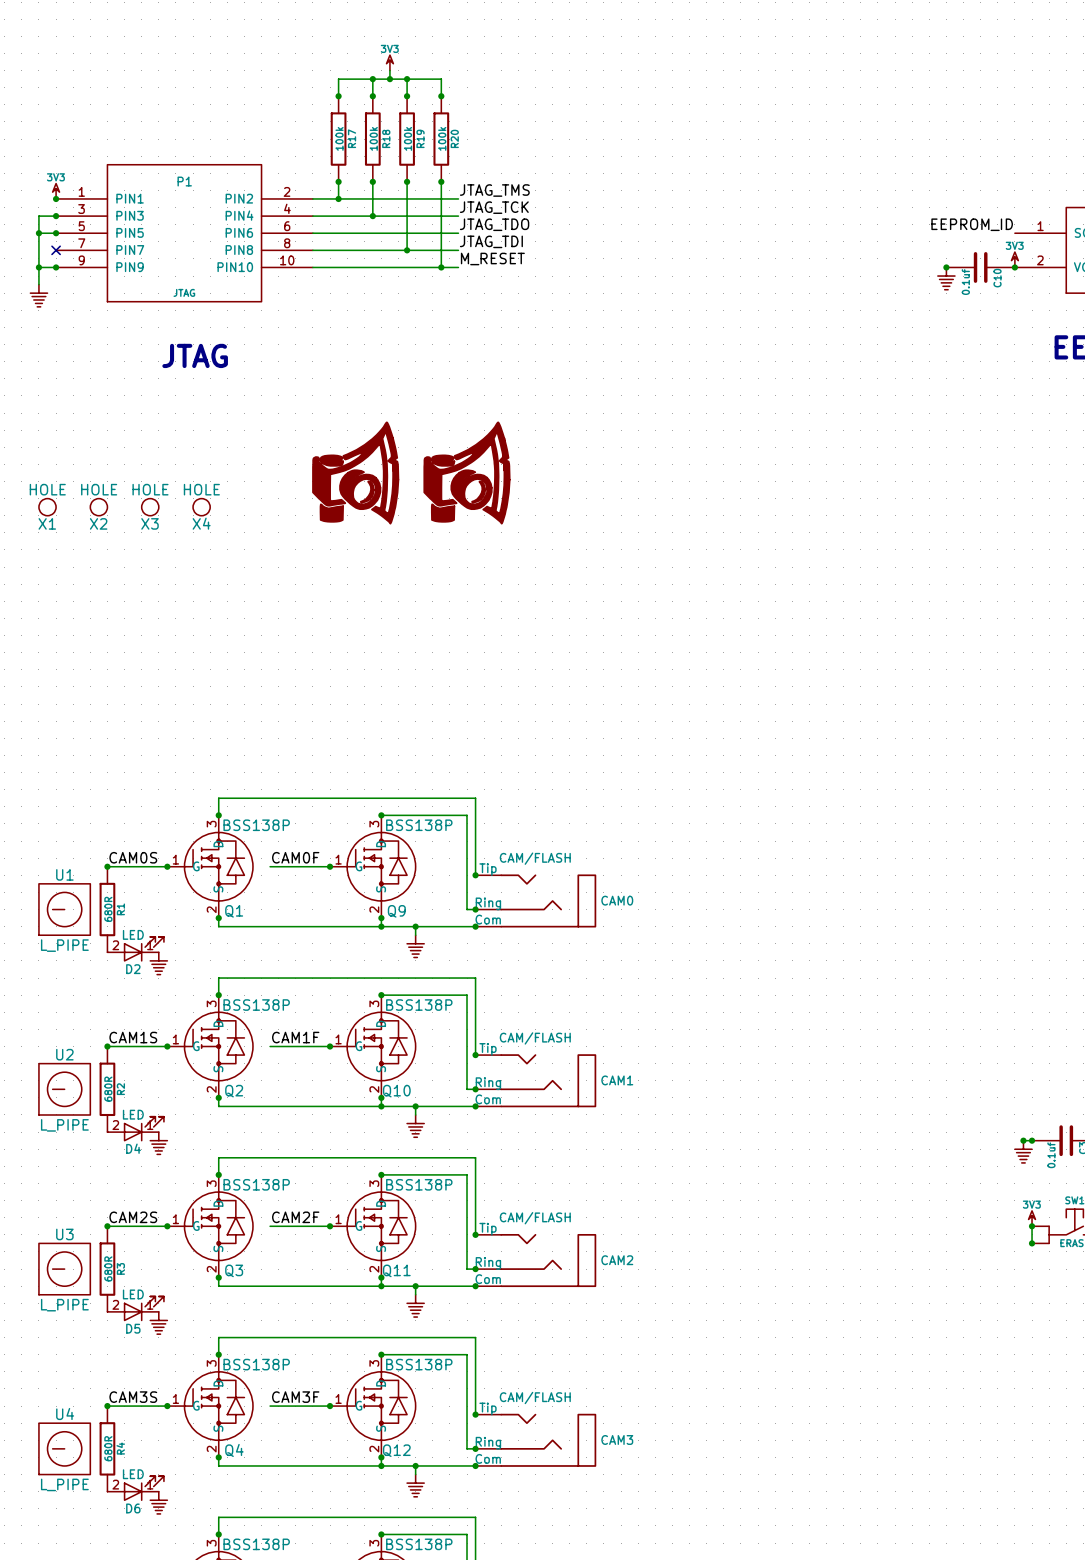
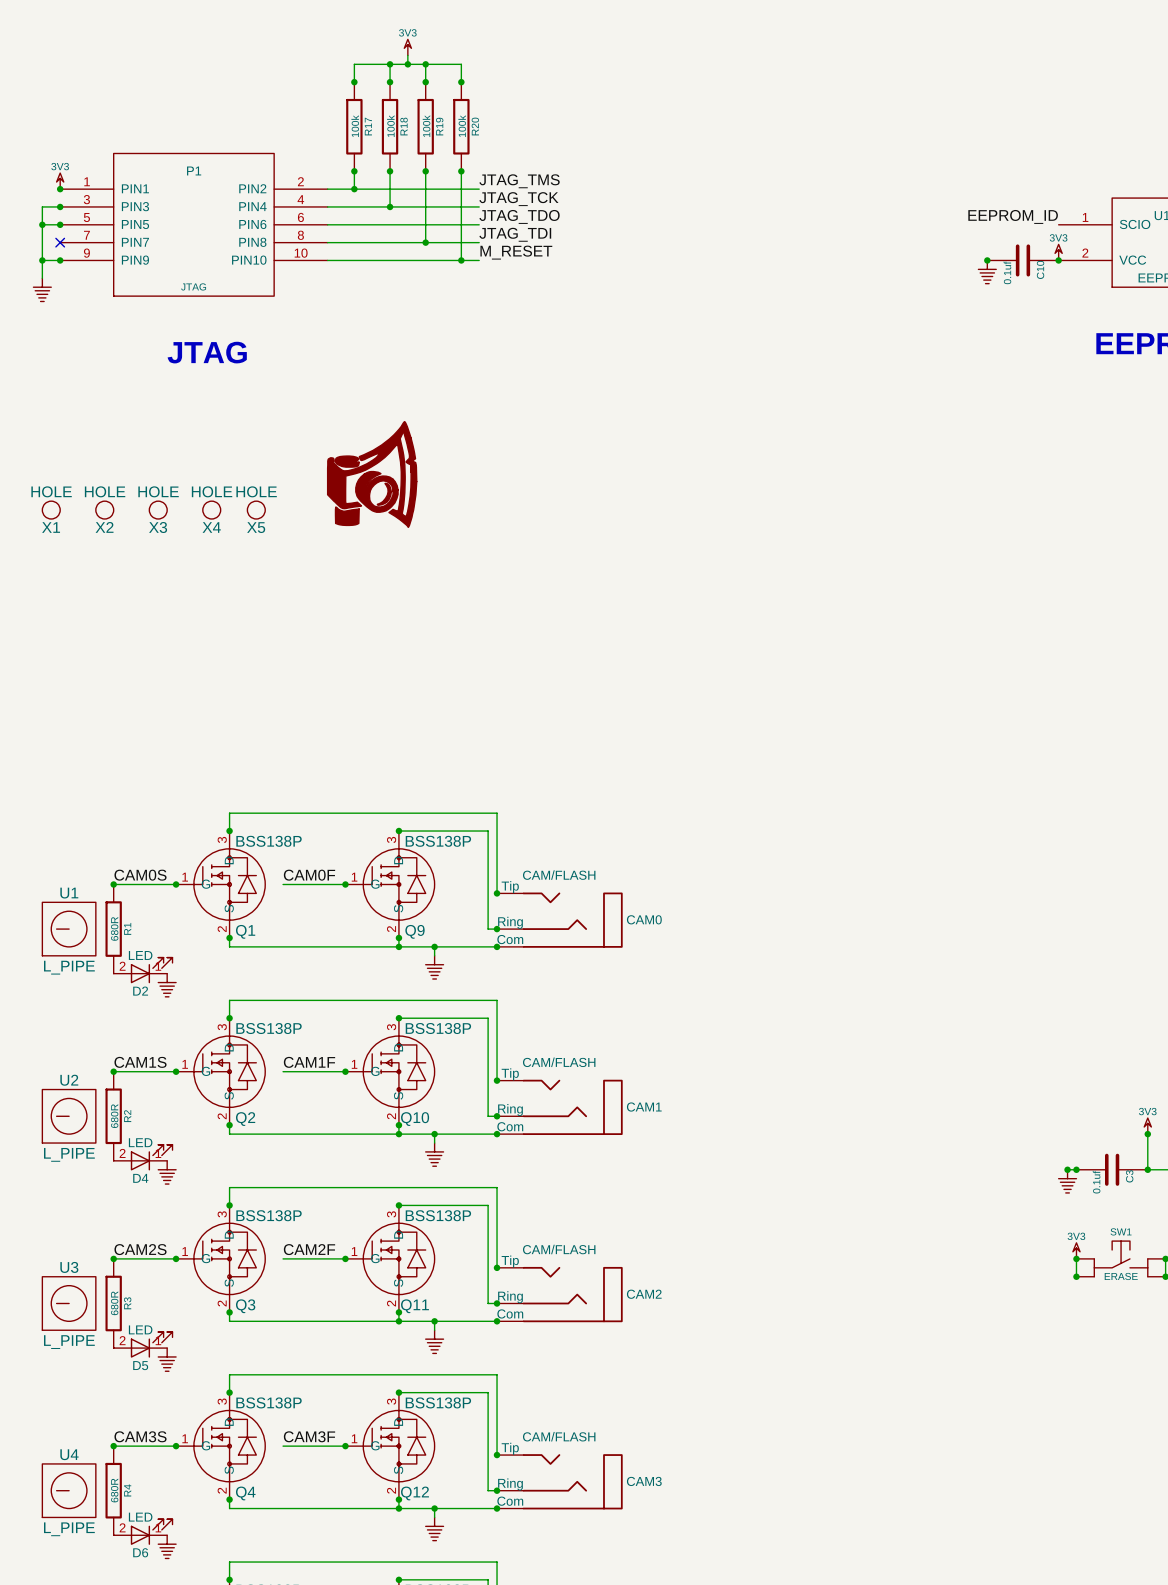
part: (467, 473) -> none
X5: none -> HOLE (256, 510)

